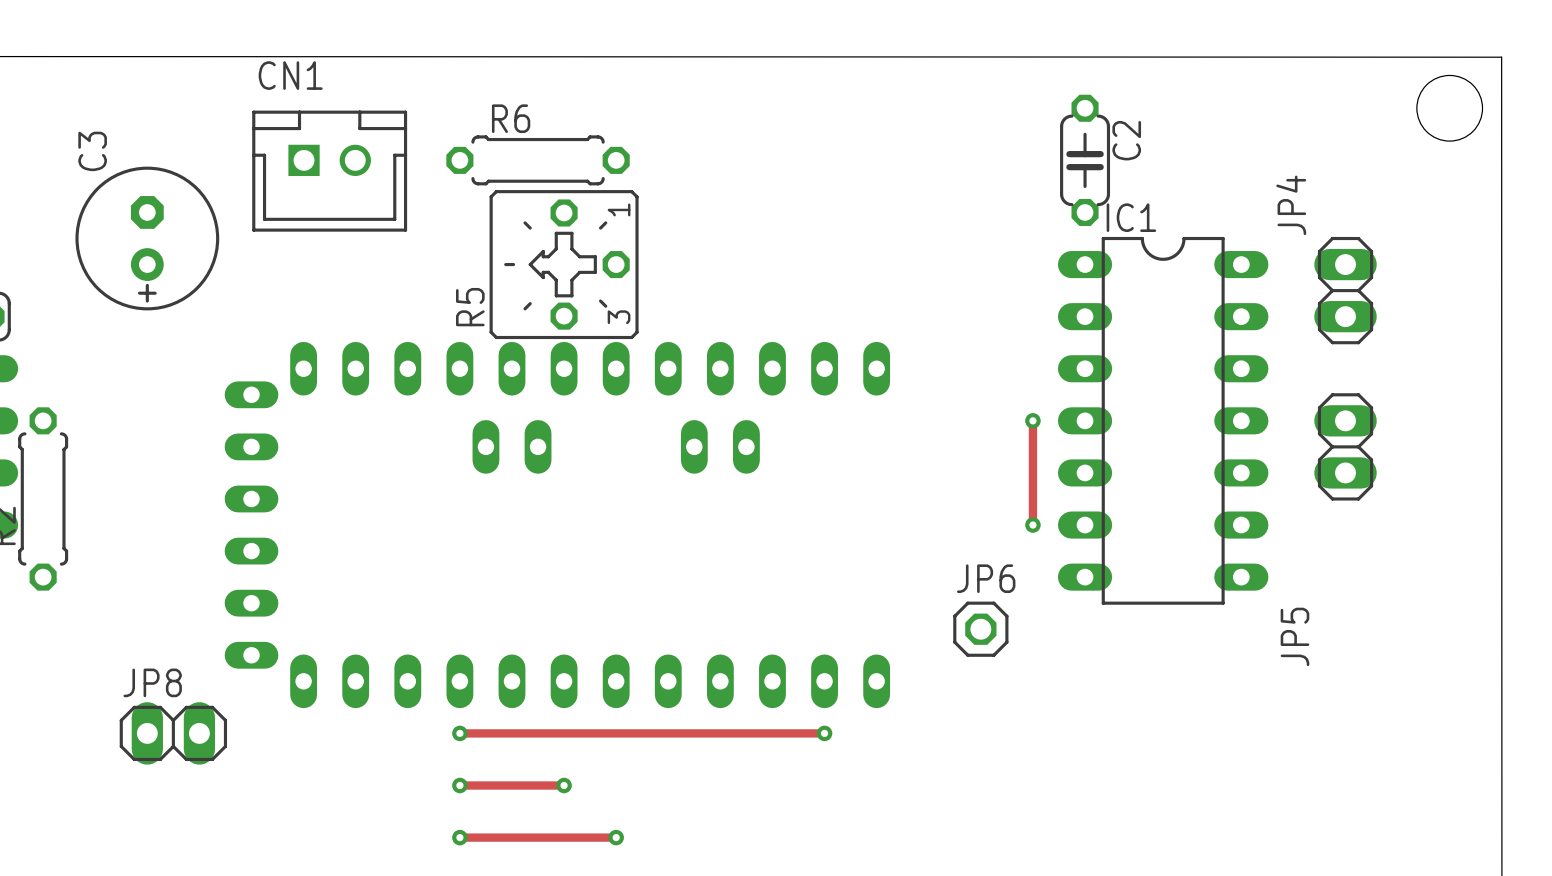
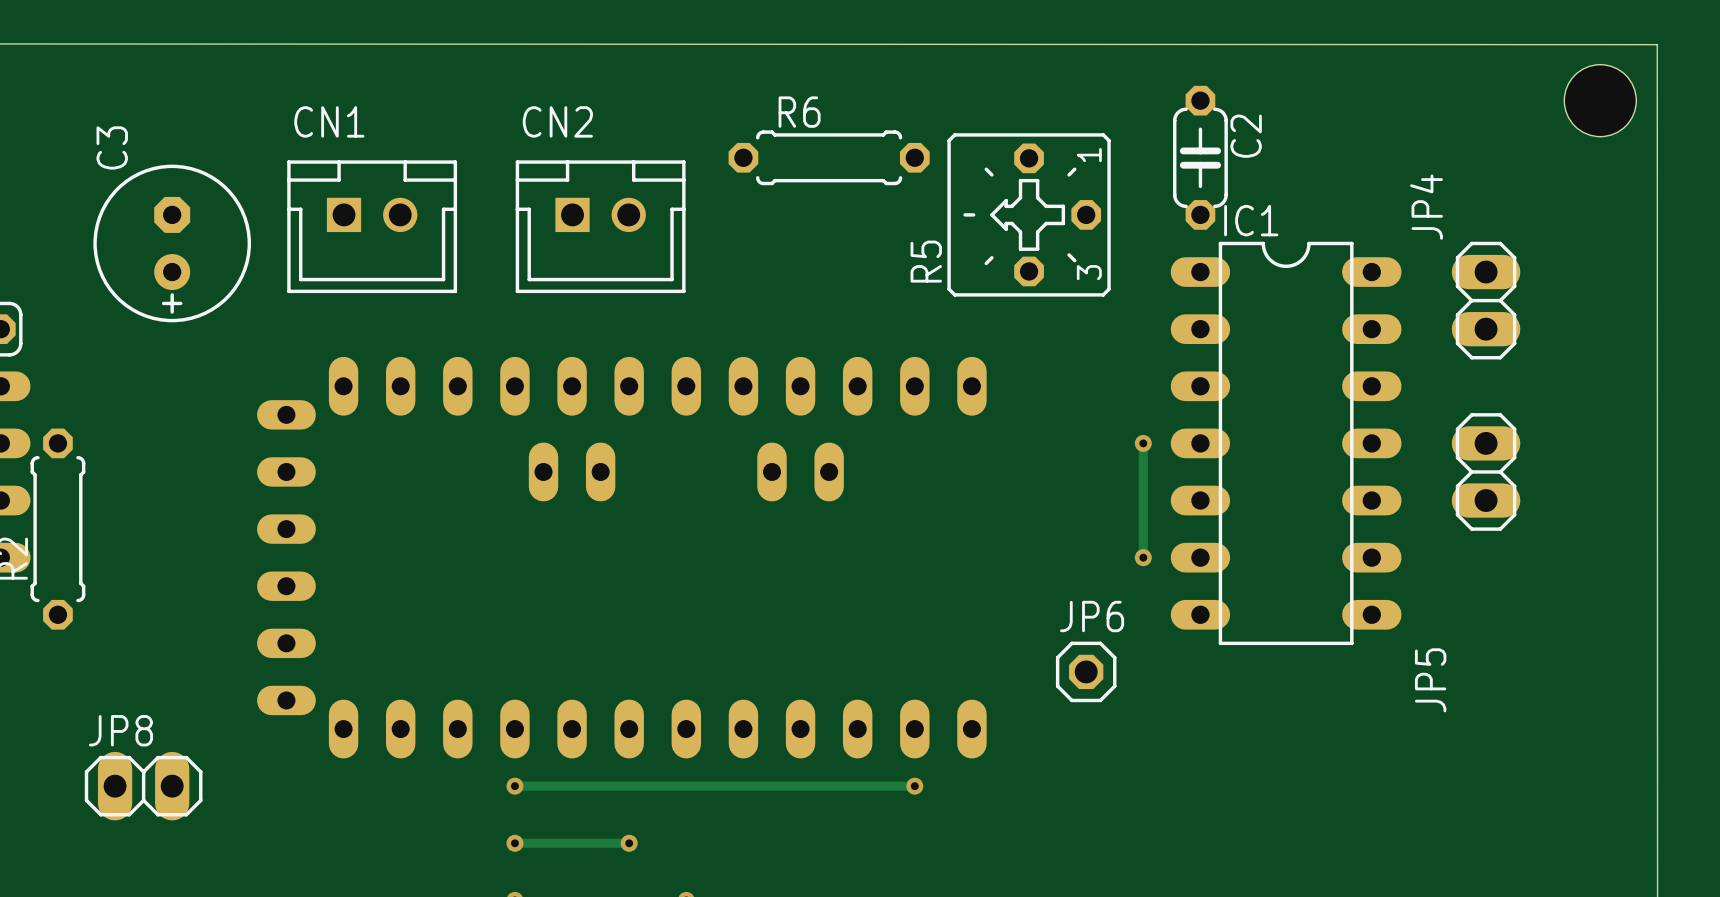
R6 position: (538, 160) -> (829, 157)
CN1 position: (329, 171) -> (372, 226)
CN2: none -> (600, 226)
R5 position: (564, 264) -> (1029, 214)
JP8 position: (173, 733) -> (143, 786)

